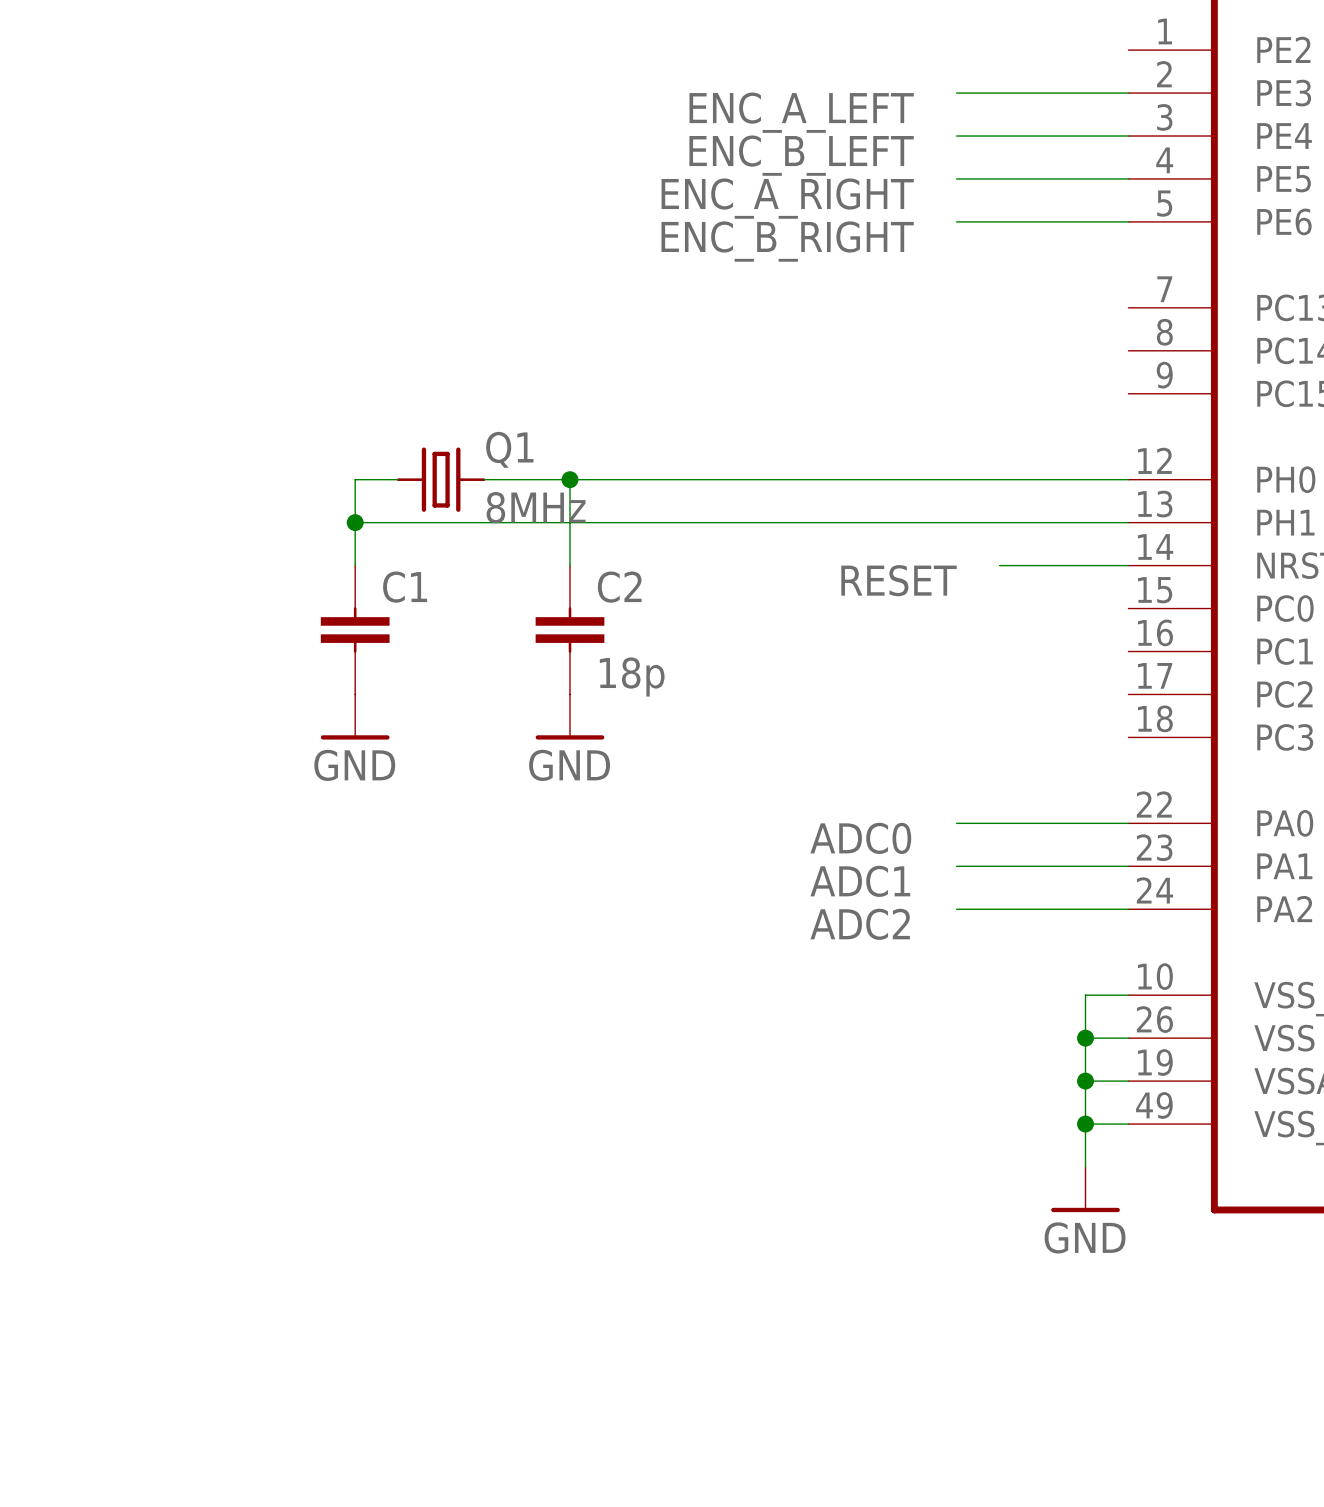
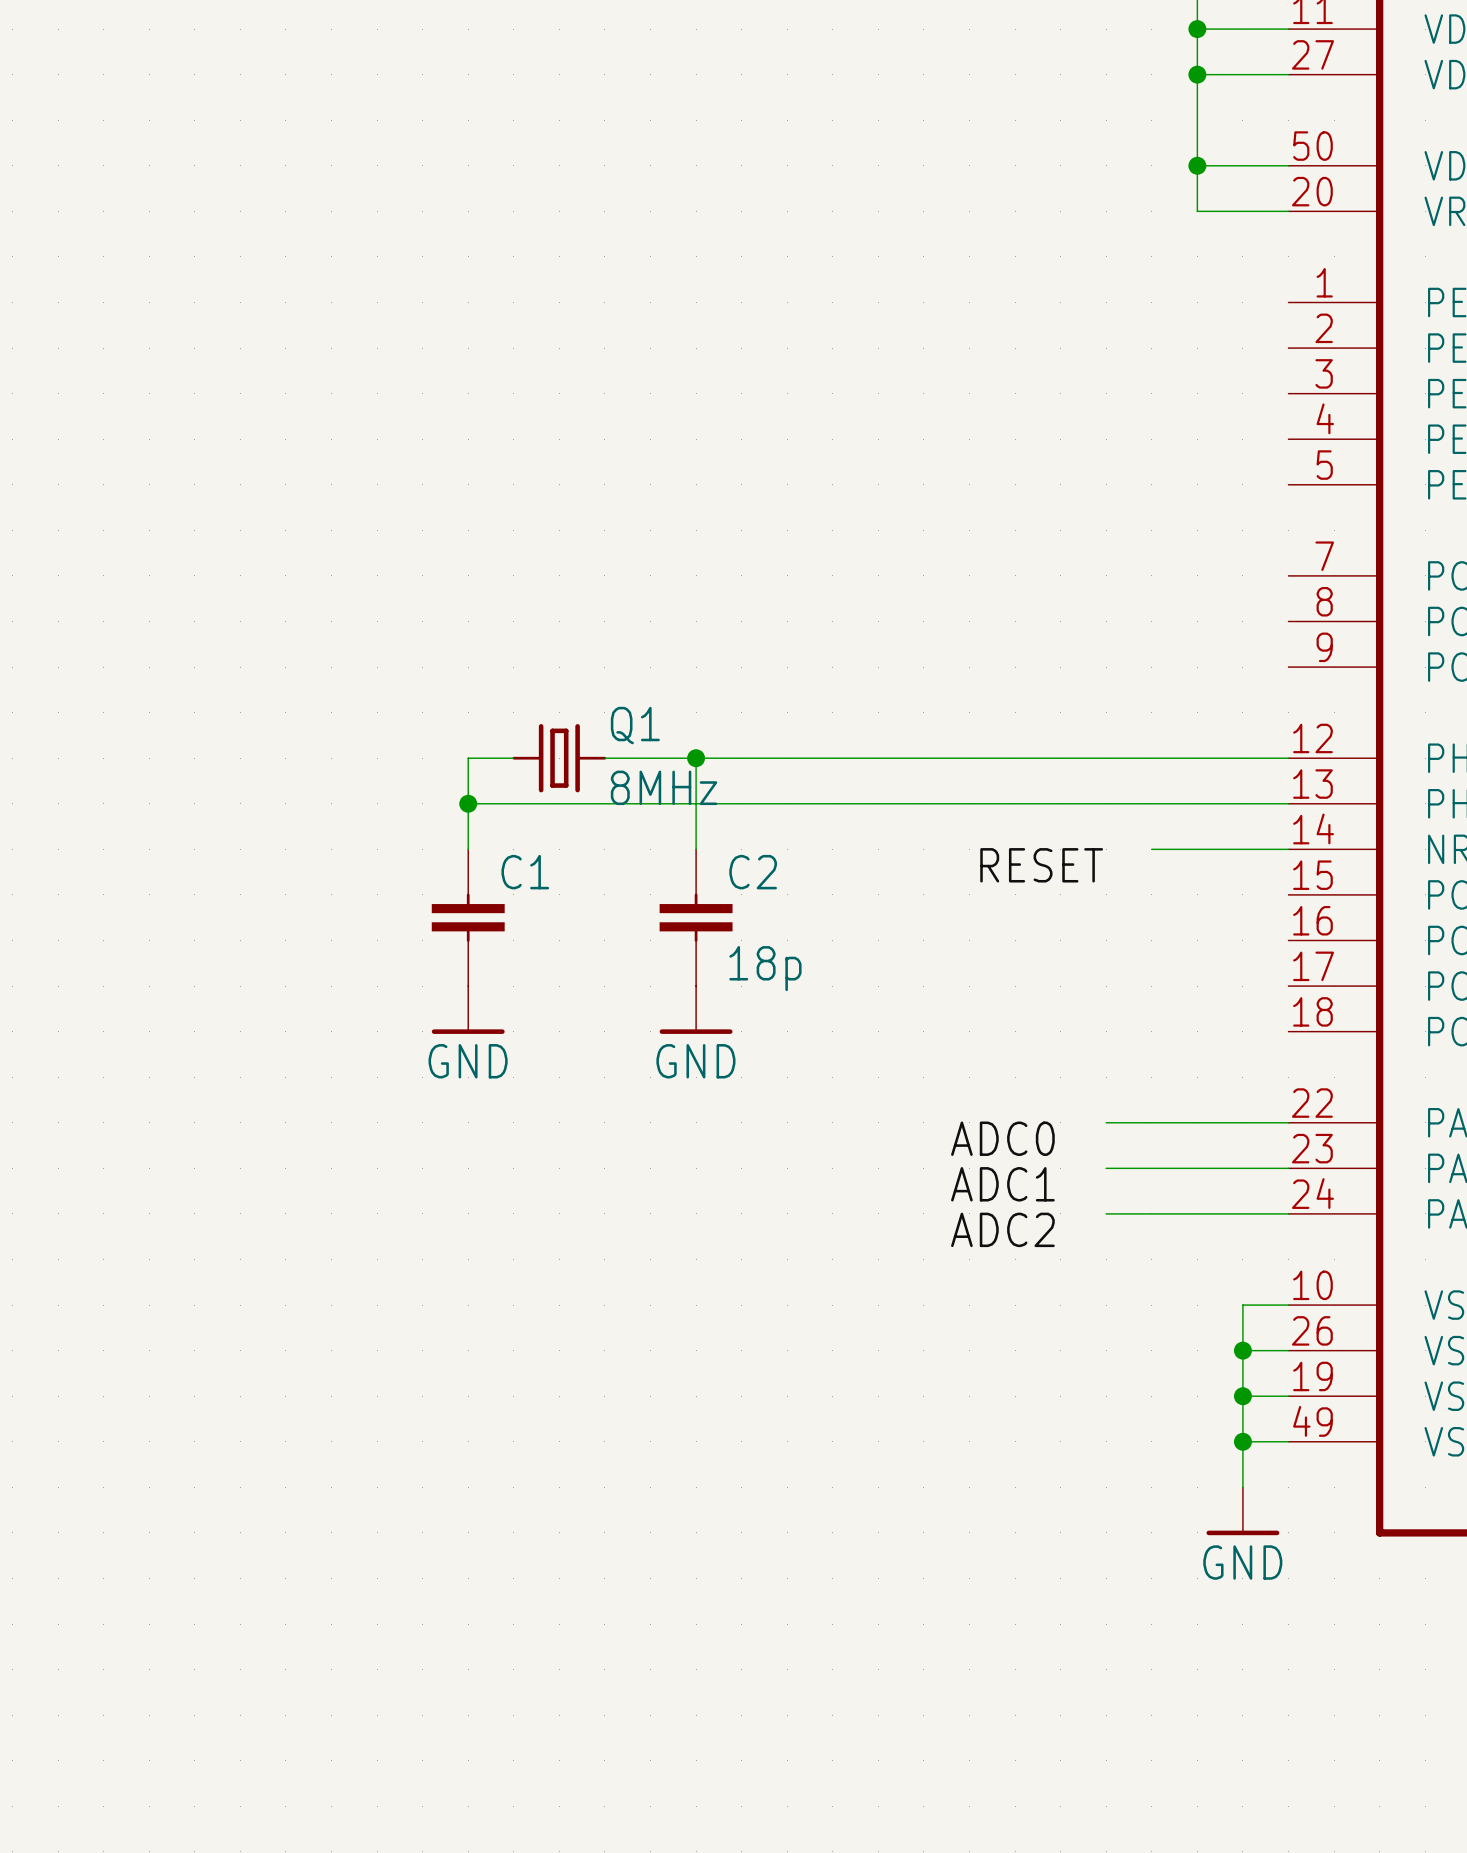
wire: (956, 93) (1128, 93) -> none
label: ENC_A_LEFT (801, 112) -> none
wire: (956, 136) (1128, 136) -> none
label: ENC_B_LEFT (801, 155) -> none
wire: (956, 178) (1128, 178) -> none
label: ENC_A_RIGHT (787, 198) -> none
wire: (956, 221) (1128, 221) -> none
label: ENC_B_RIGHT (787, 241) -> none

